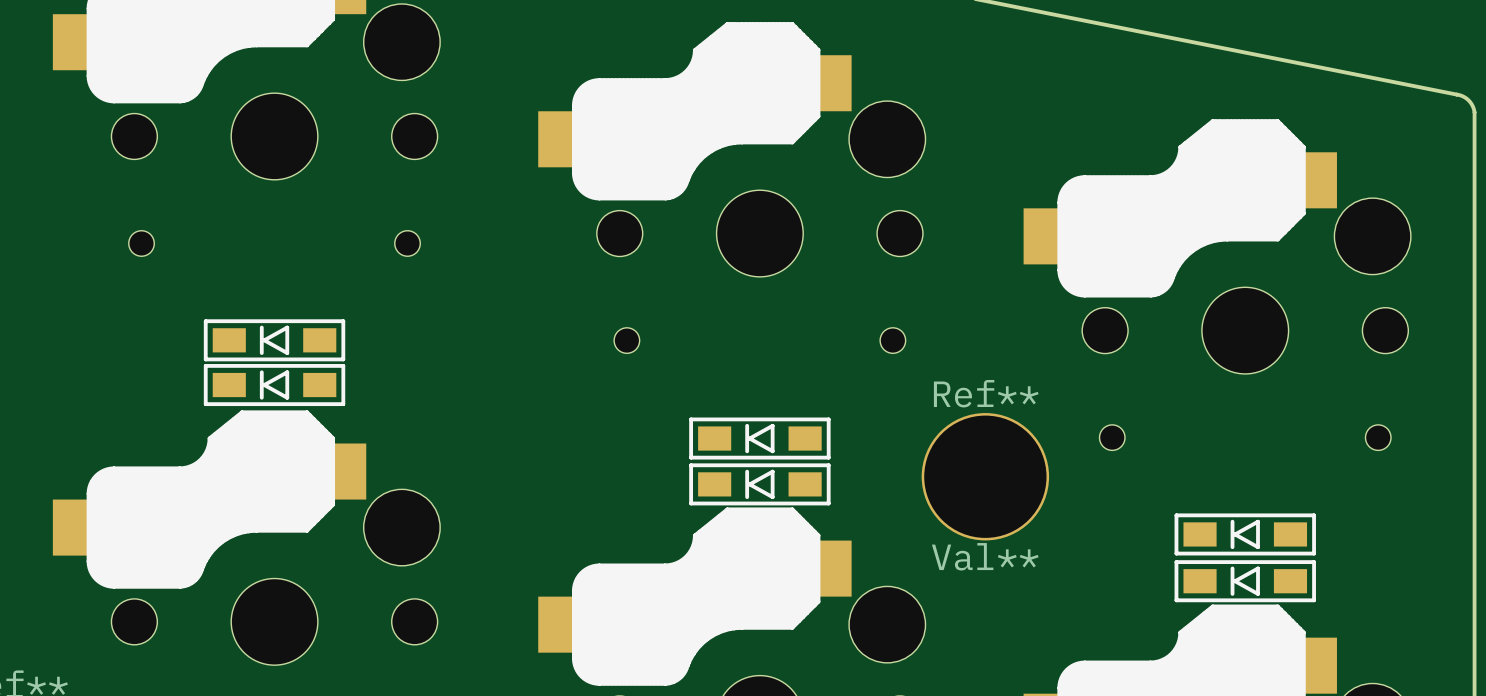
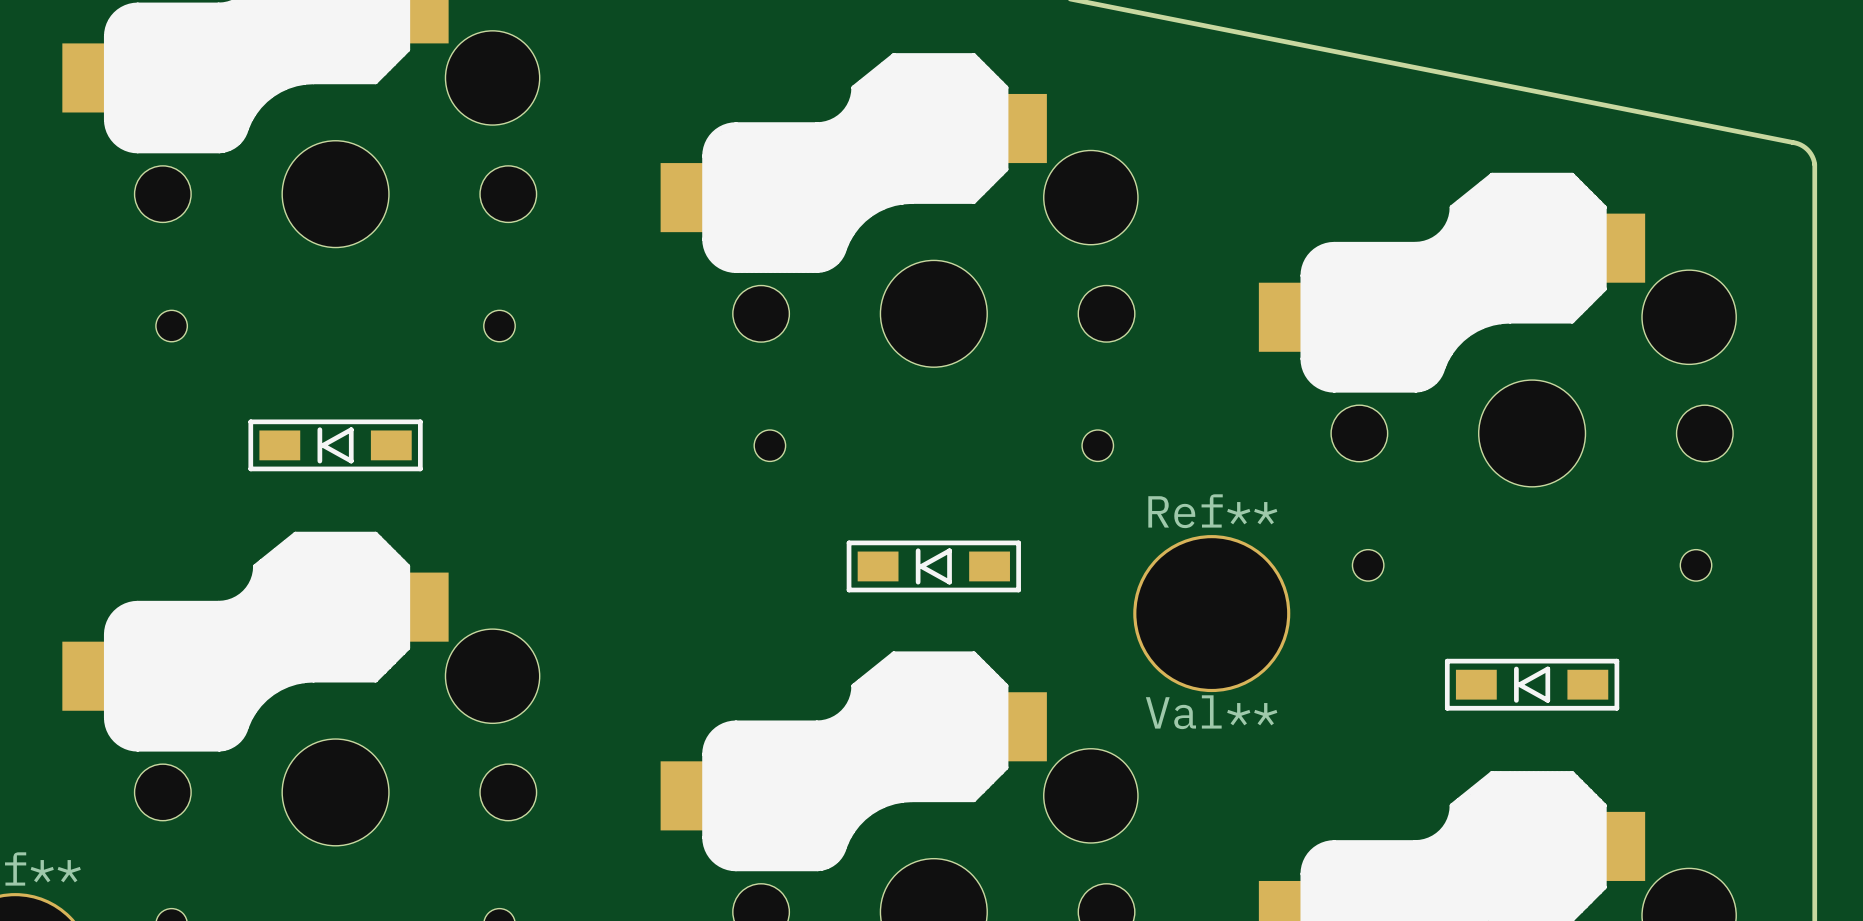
part: (274, 385) -> none
part: (759, 484) -> none
part: (1245, 581) -> none

